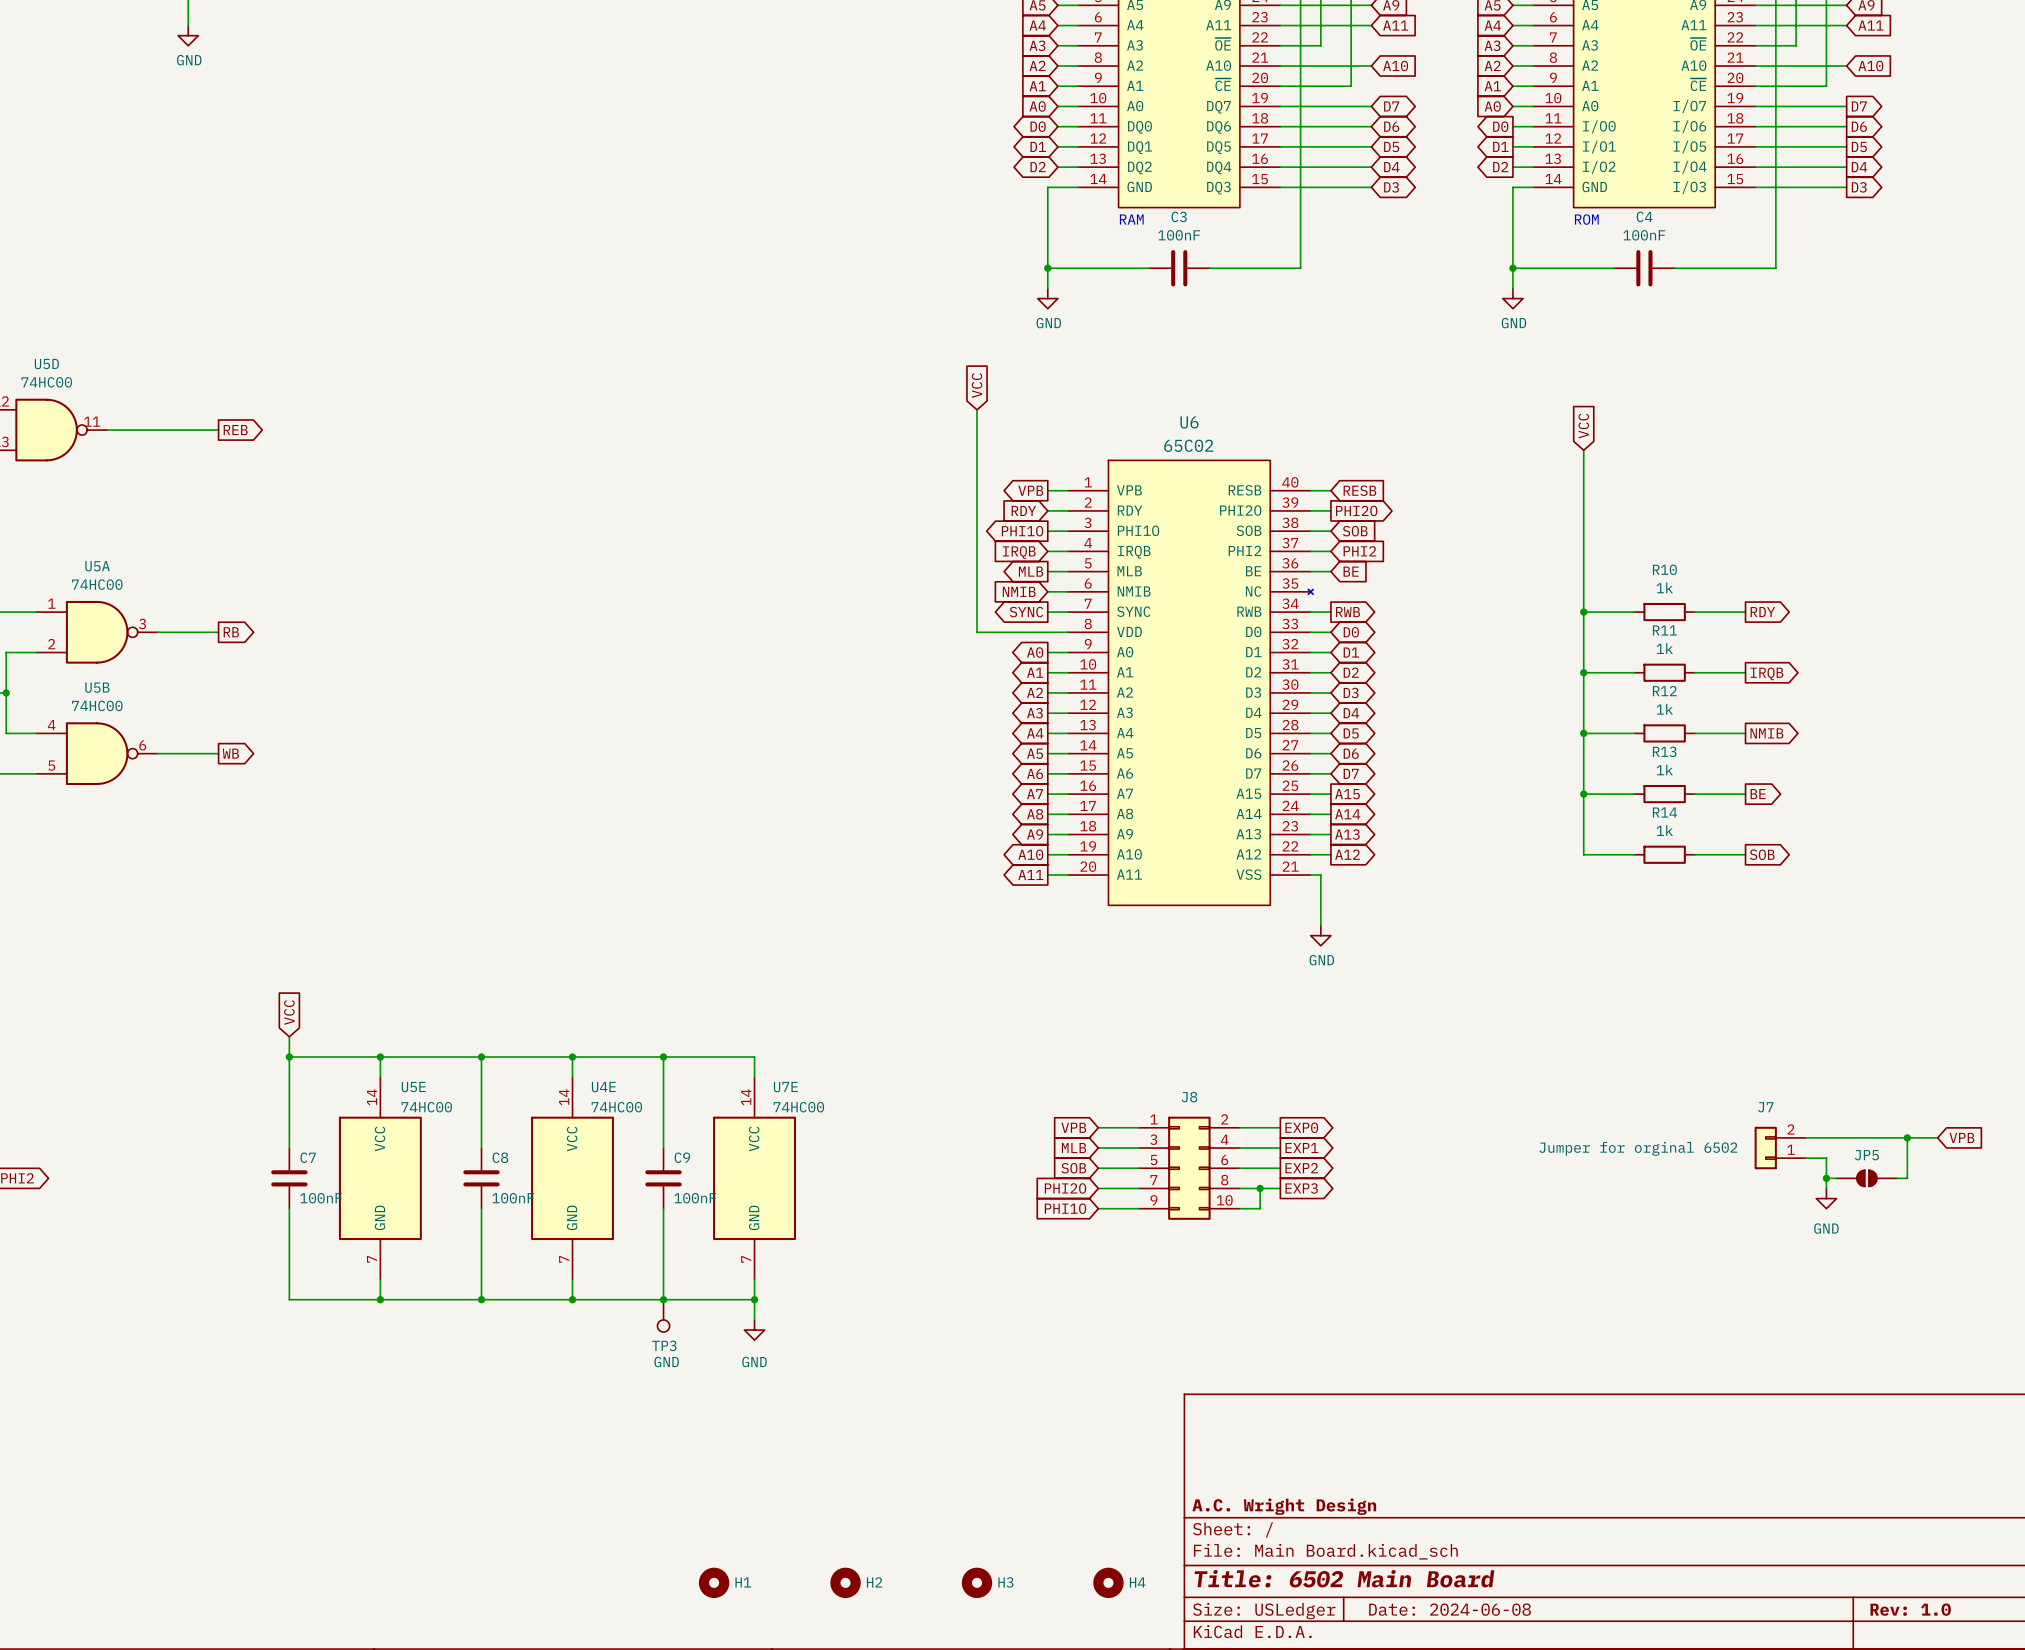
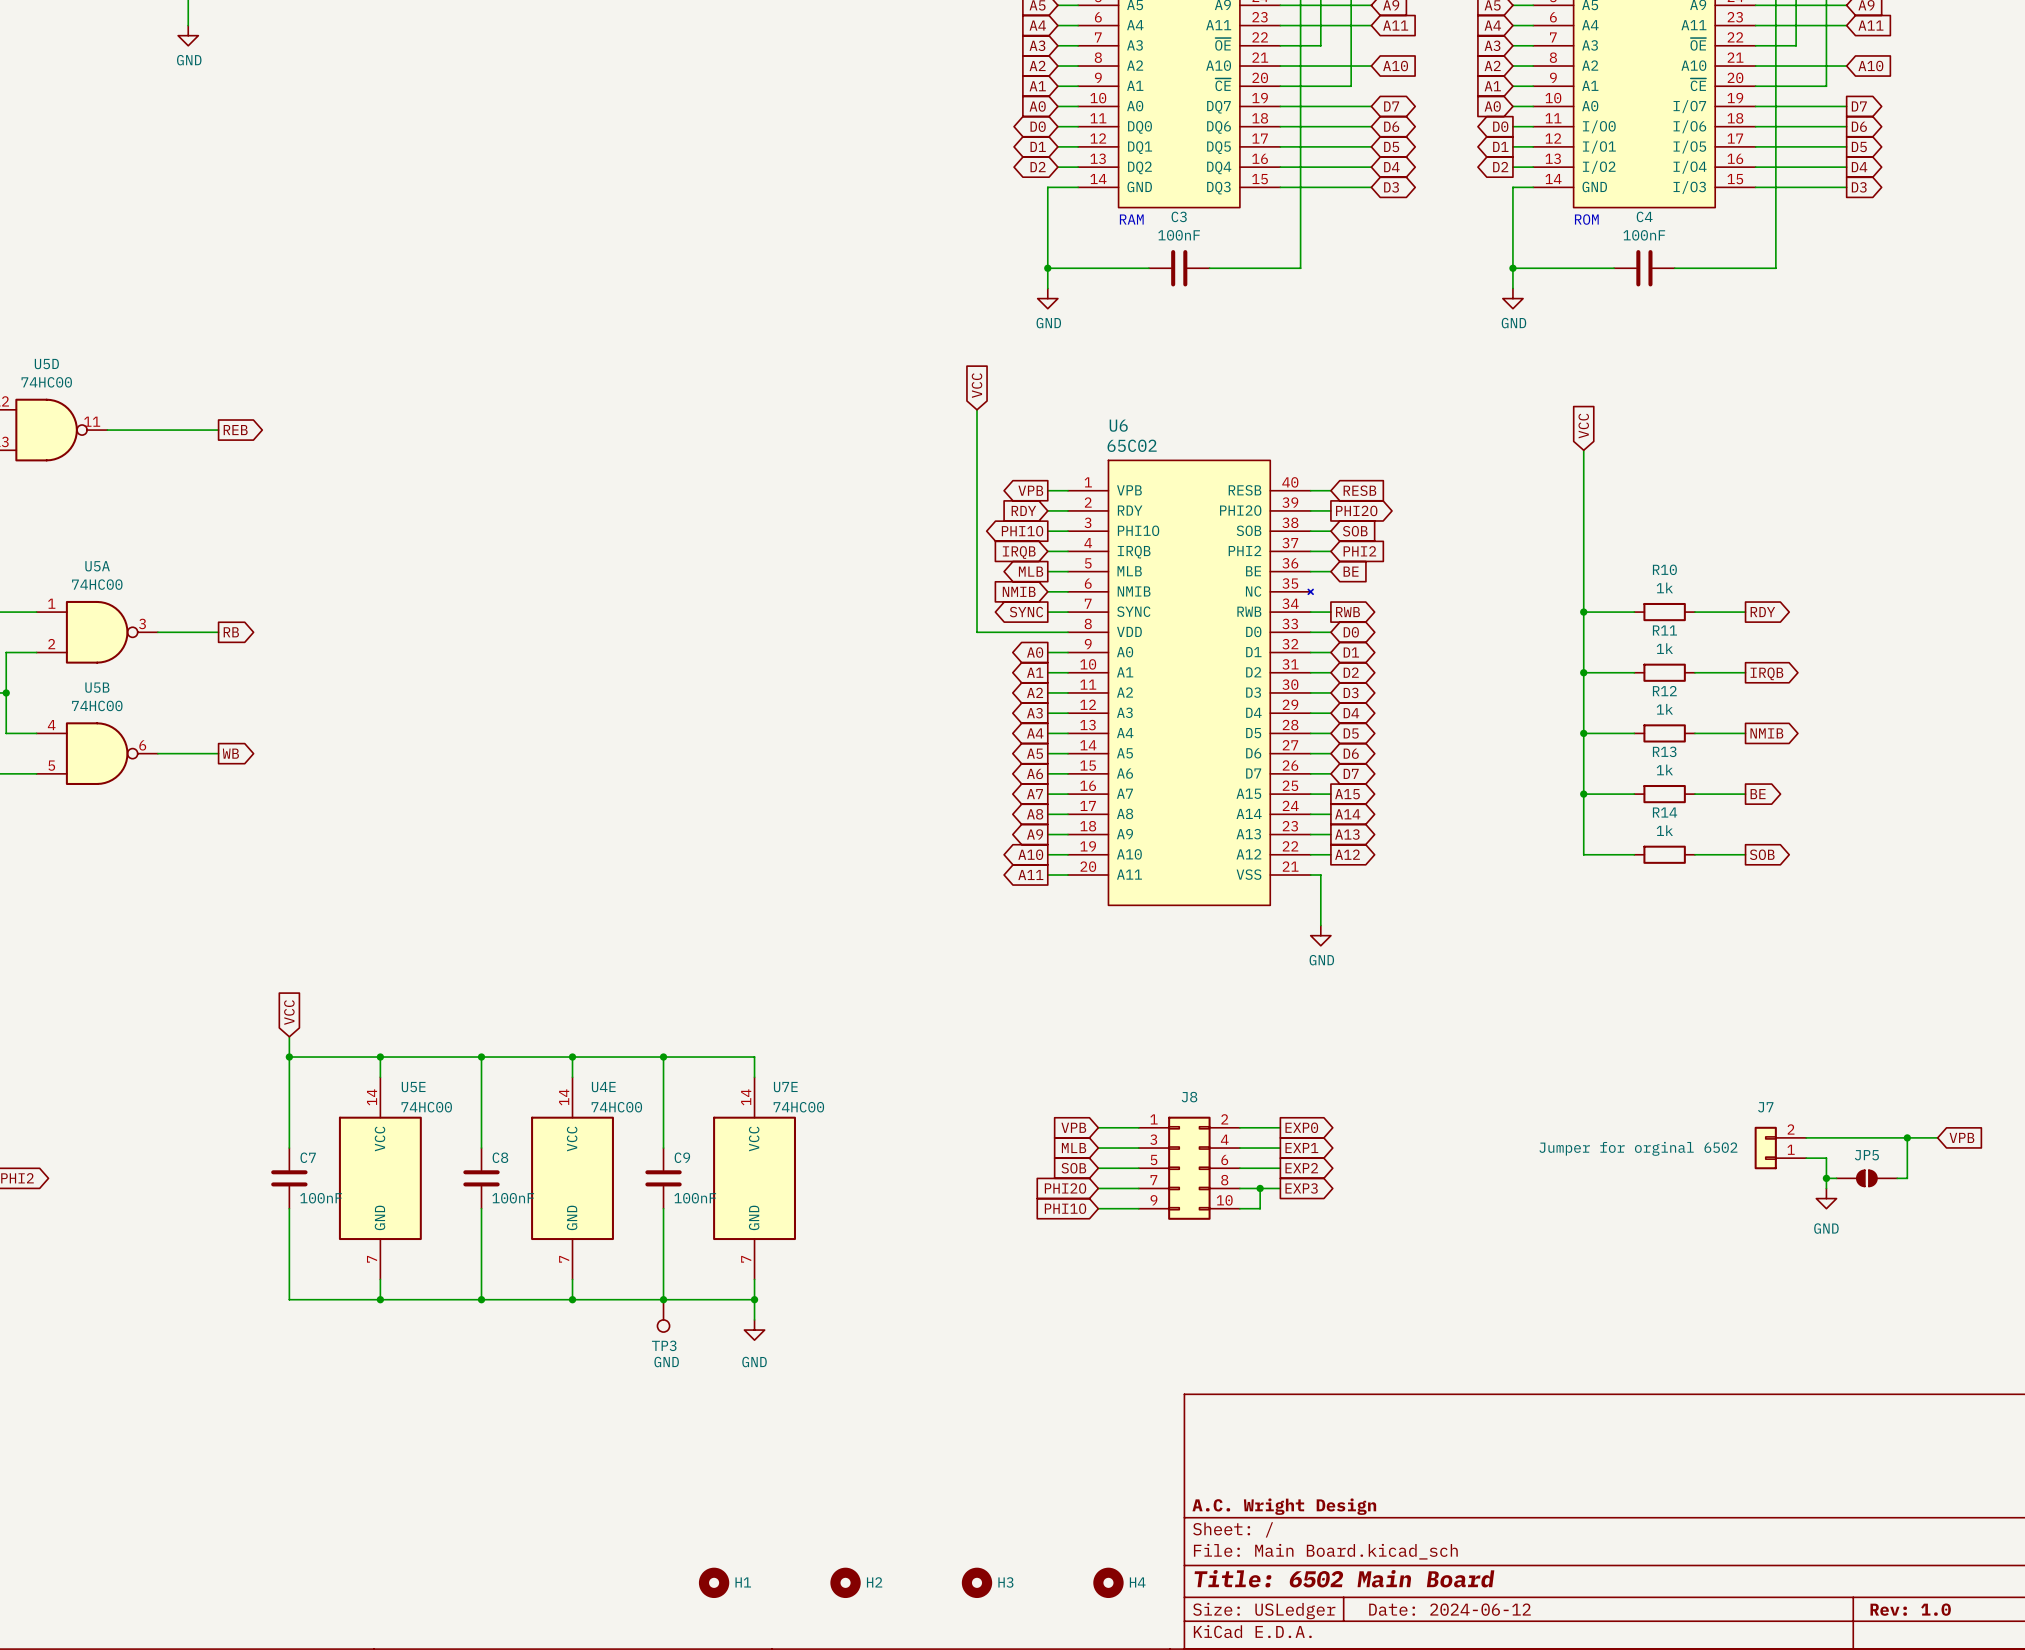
U6 name position: U6 (1189, 422) -> U6 (1118, 425)
U6 value position: 65C02 (1188, 445) -> 65C02 (1132, 445)
title block: Date: 2024-06-08 (1450, 1609) -> Date: 2024-06-12 (1449, 1609)

